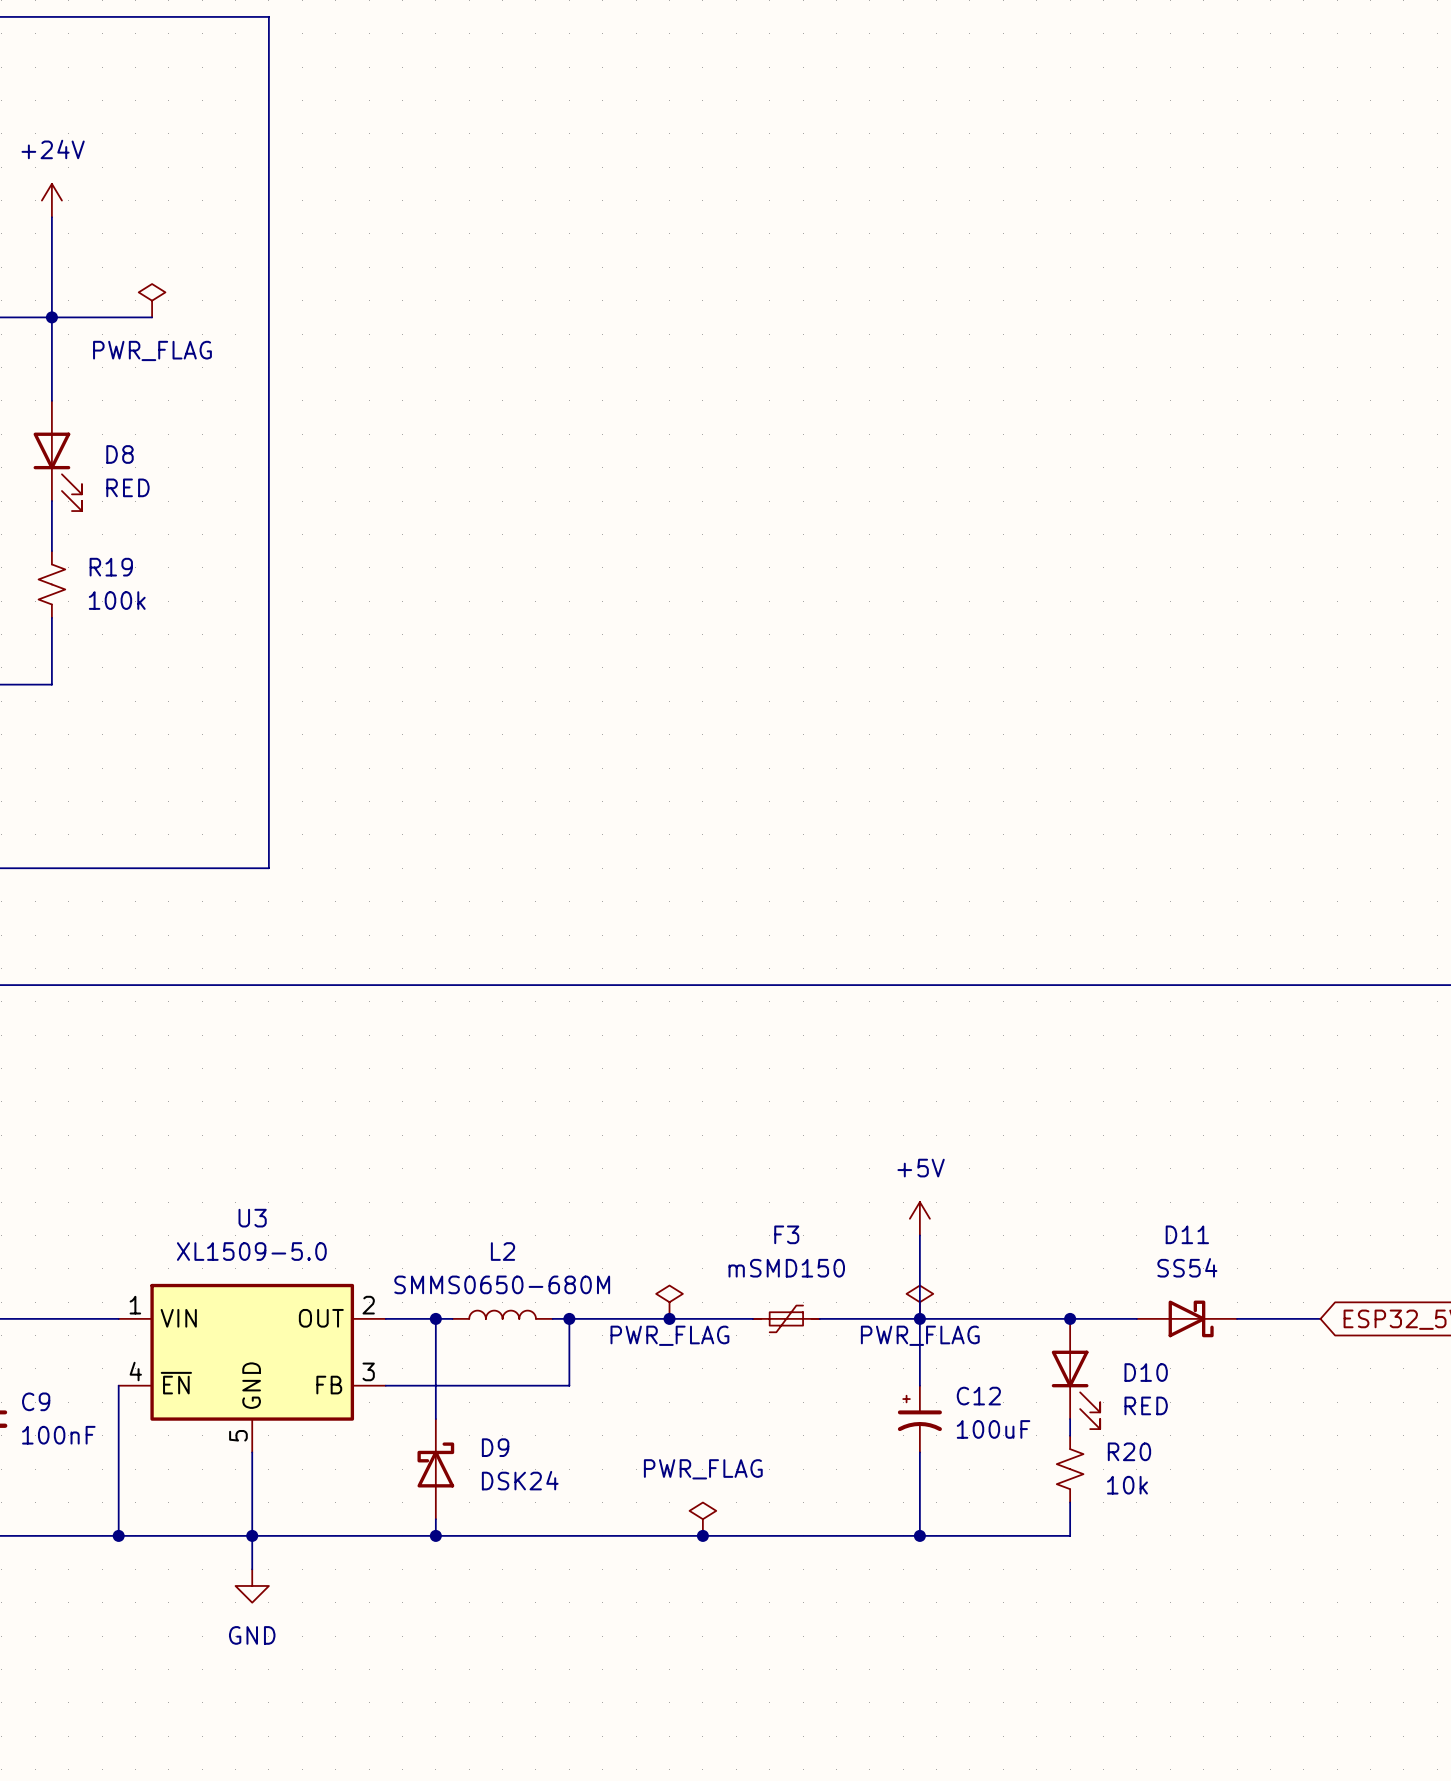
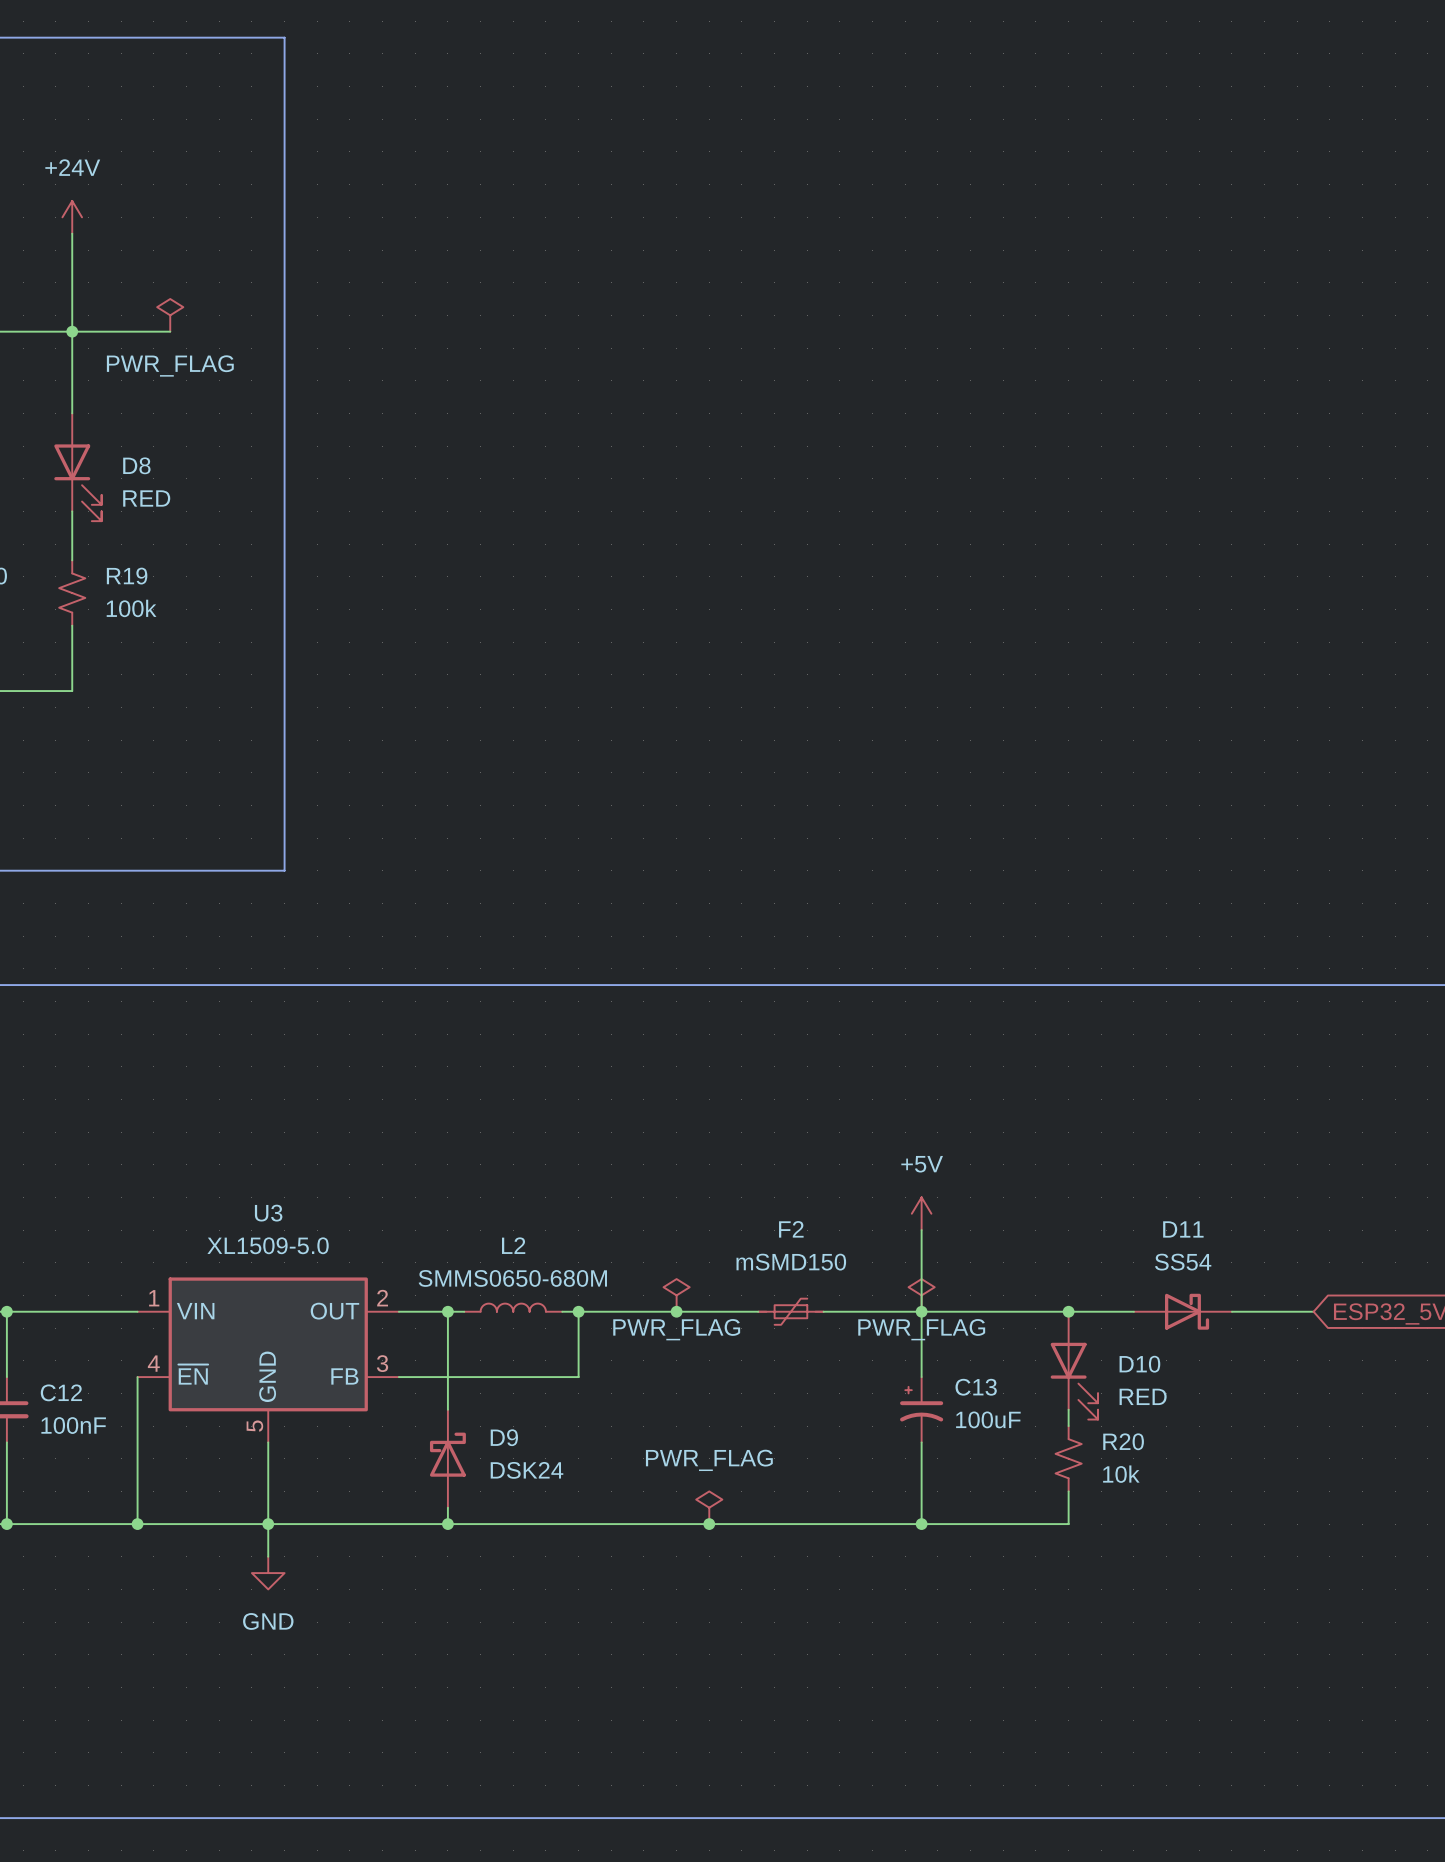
F3 name: F3 (786, 1234) -> F2 (791, 1229)
C12 name: C12 (978, 1396) -> C13 (976, 1387)
C9 name: C9 (36, 1401) -> C12 (61, 1392)

